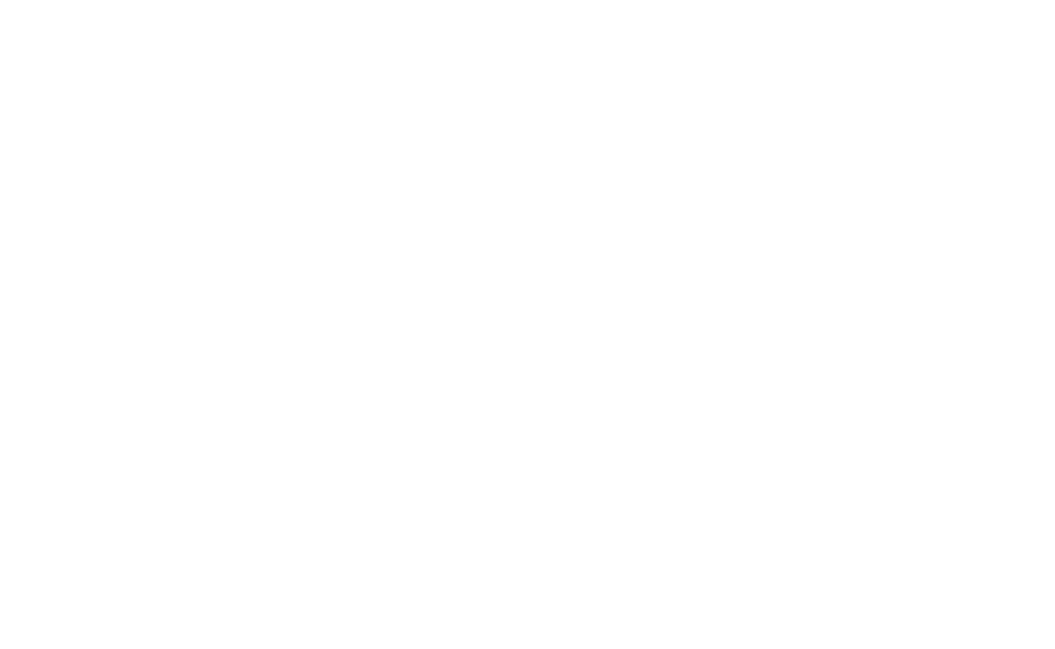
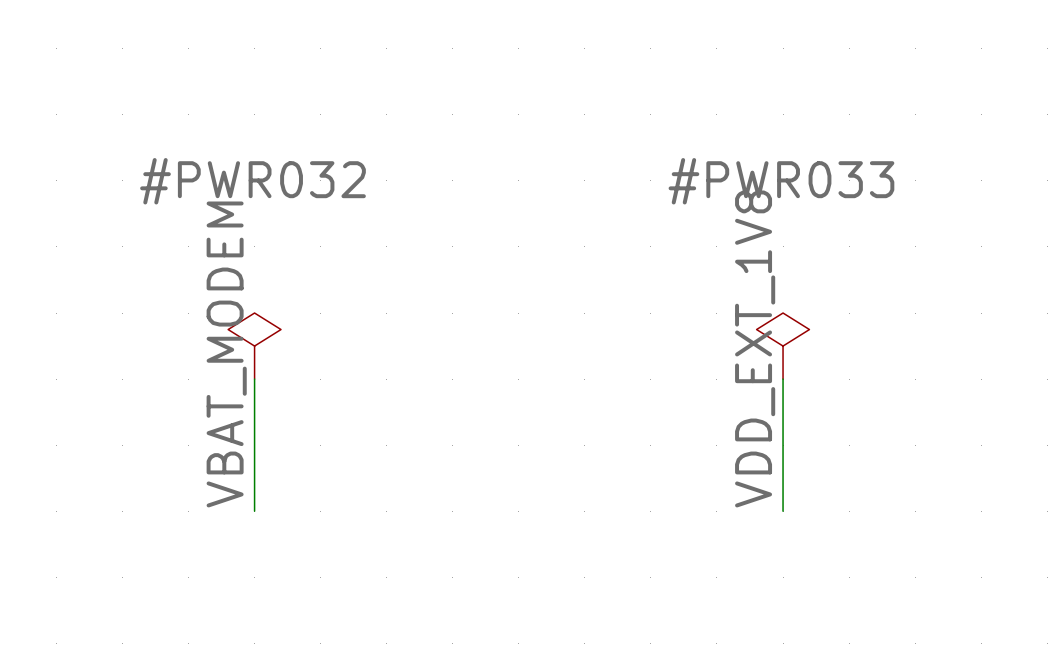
#PWR032: none -> (254, 346)
#PWR033: none -> (783, 346)
label: none -> VDD_EXT_1V8 (755, 348)
label: none -> VBAT_MODEM (226, 354)
wire: none -> (254, 379) (254, 511)
wire: none -> (783, 379) (783, 511)

